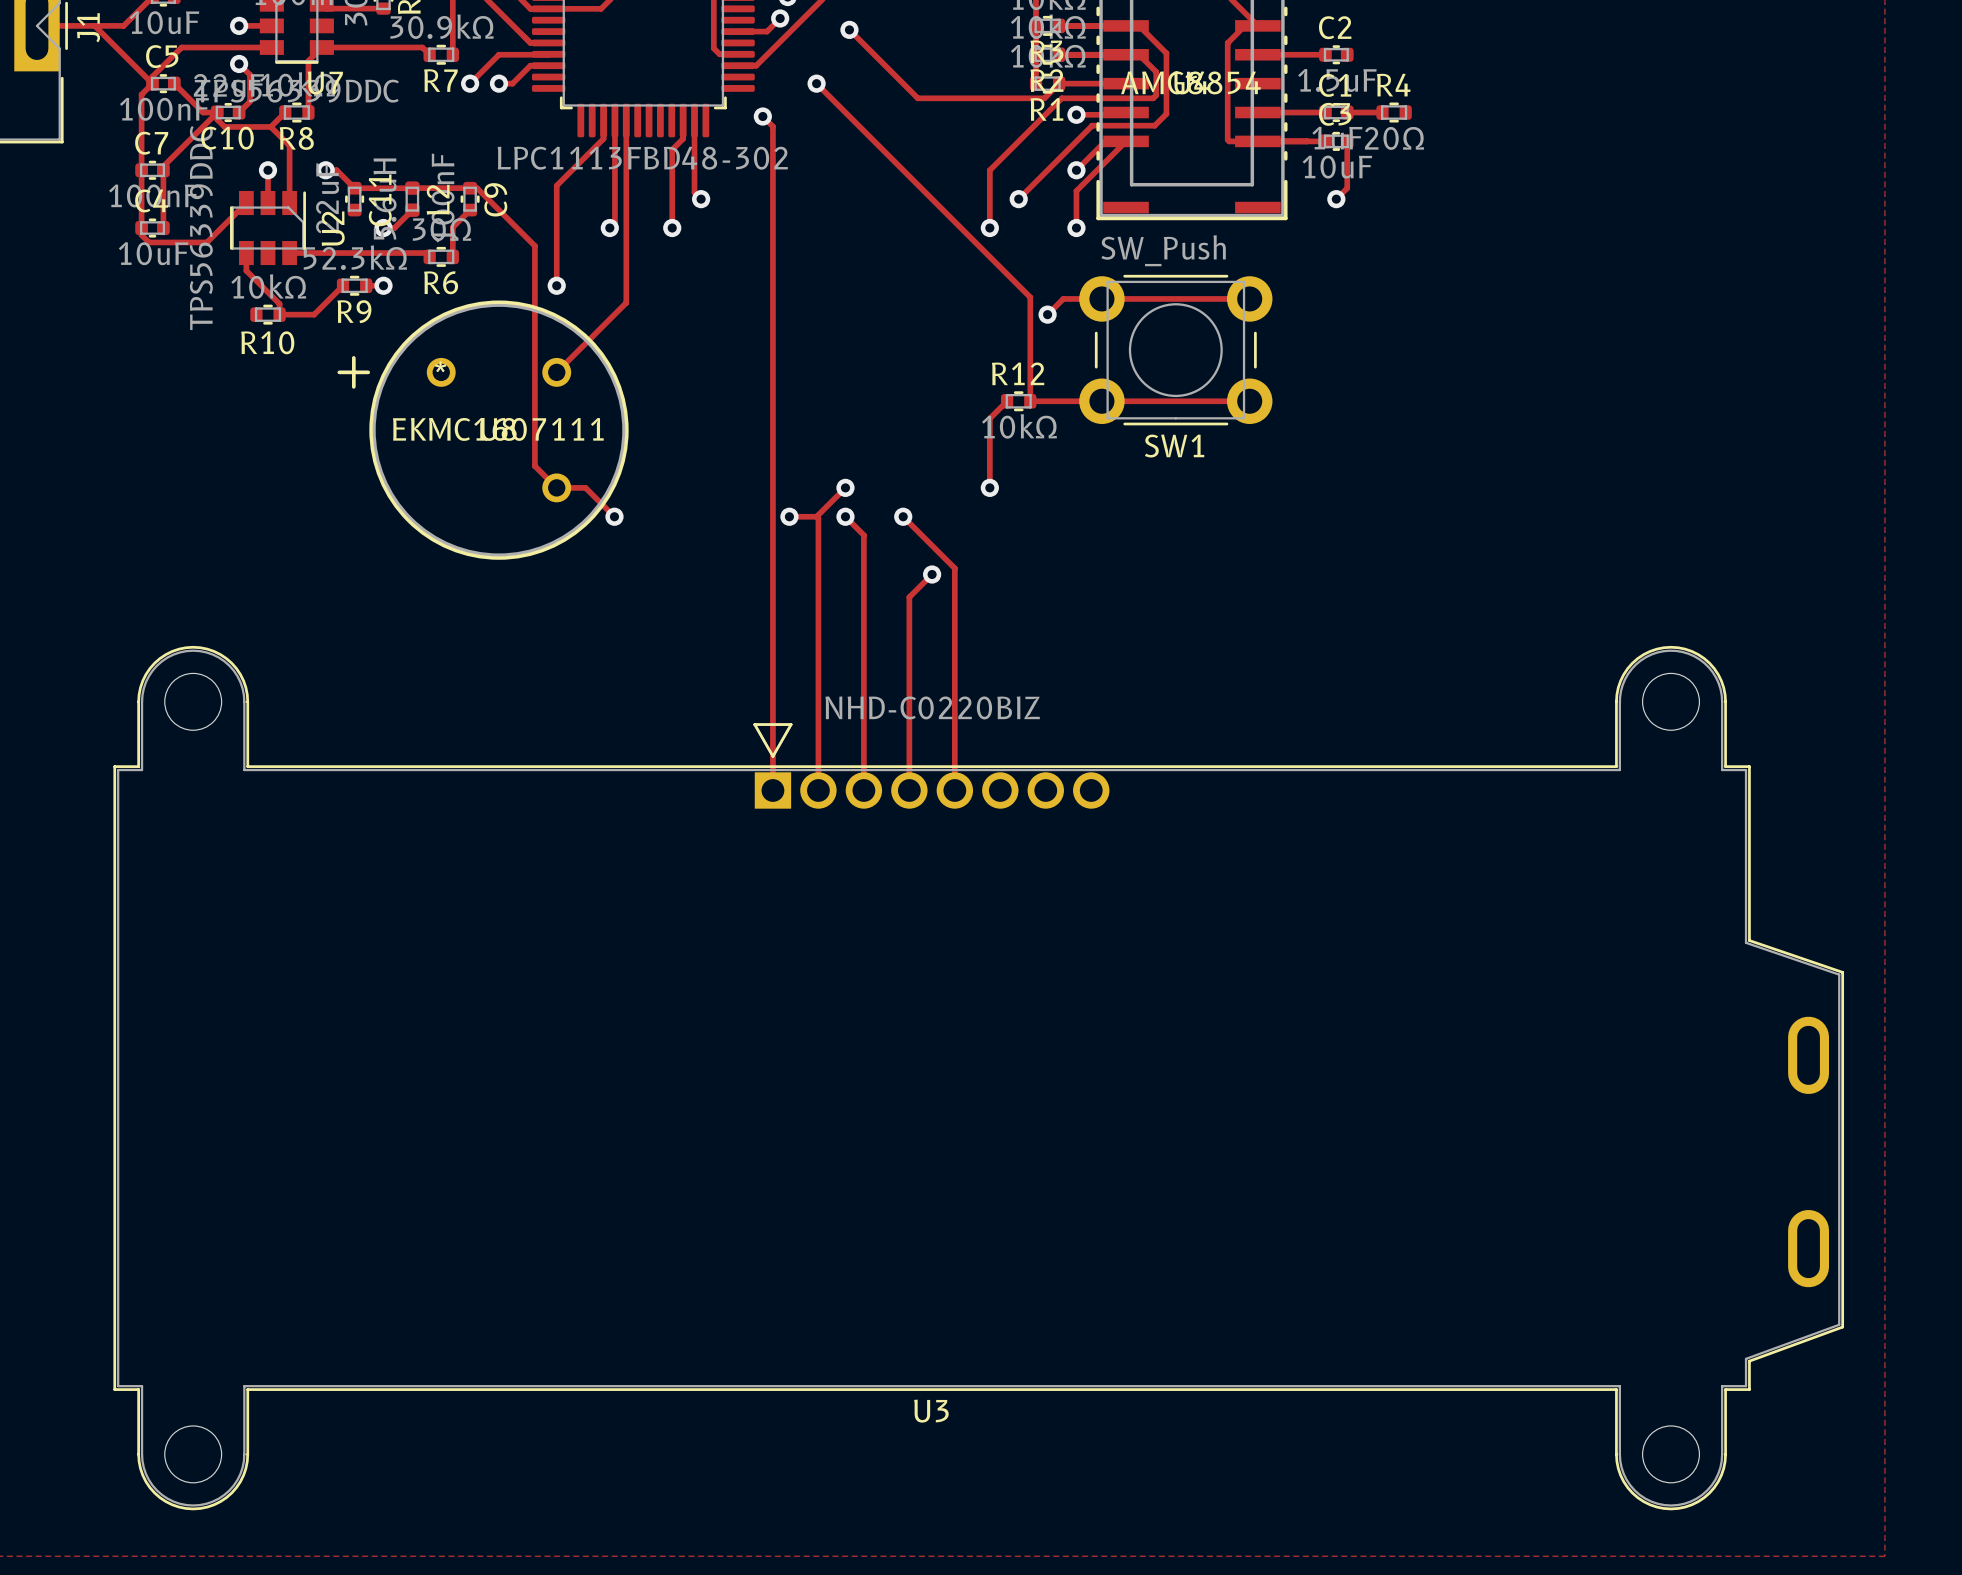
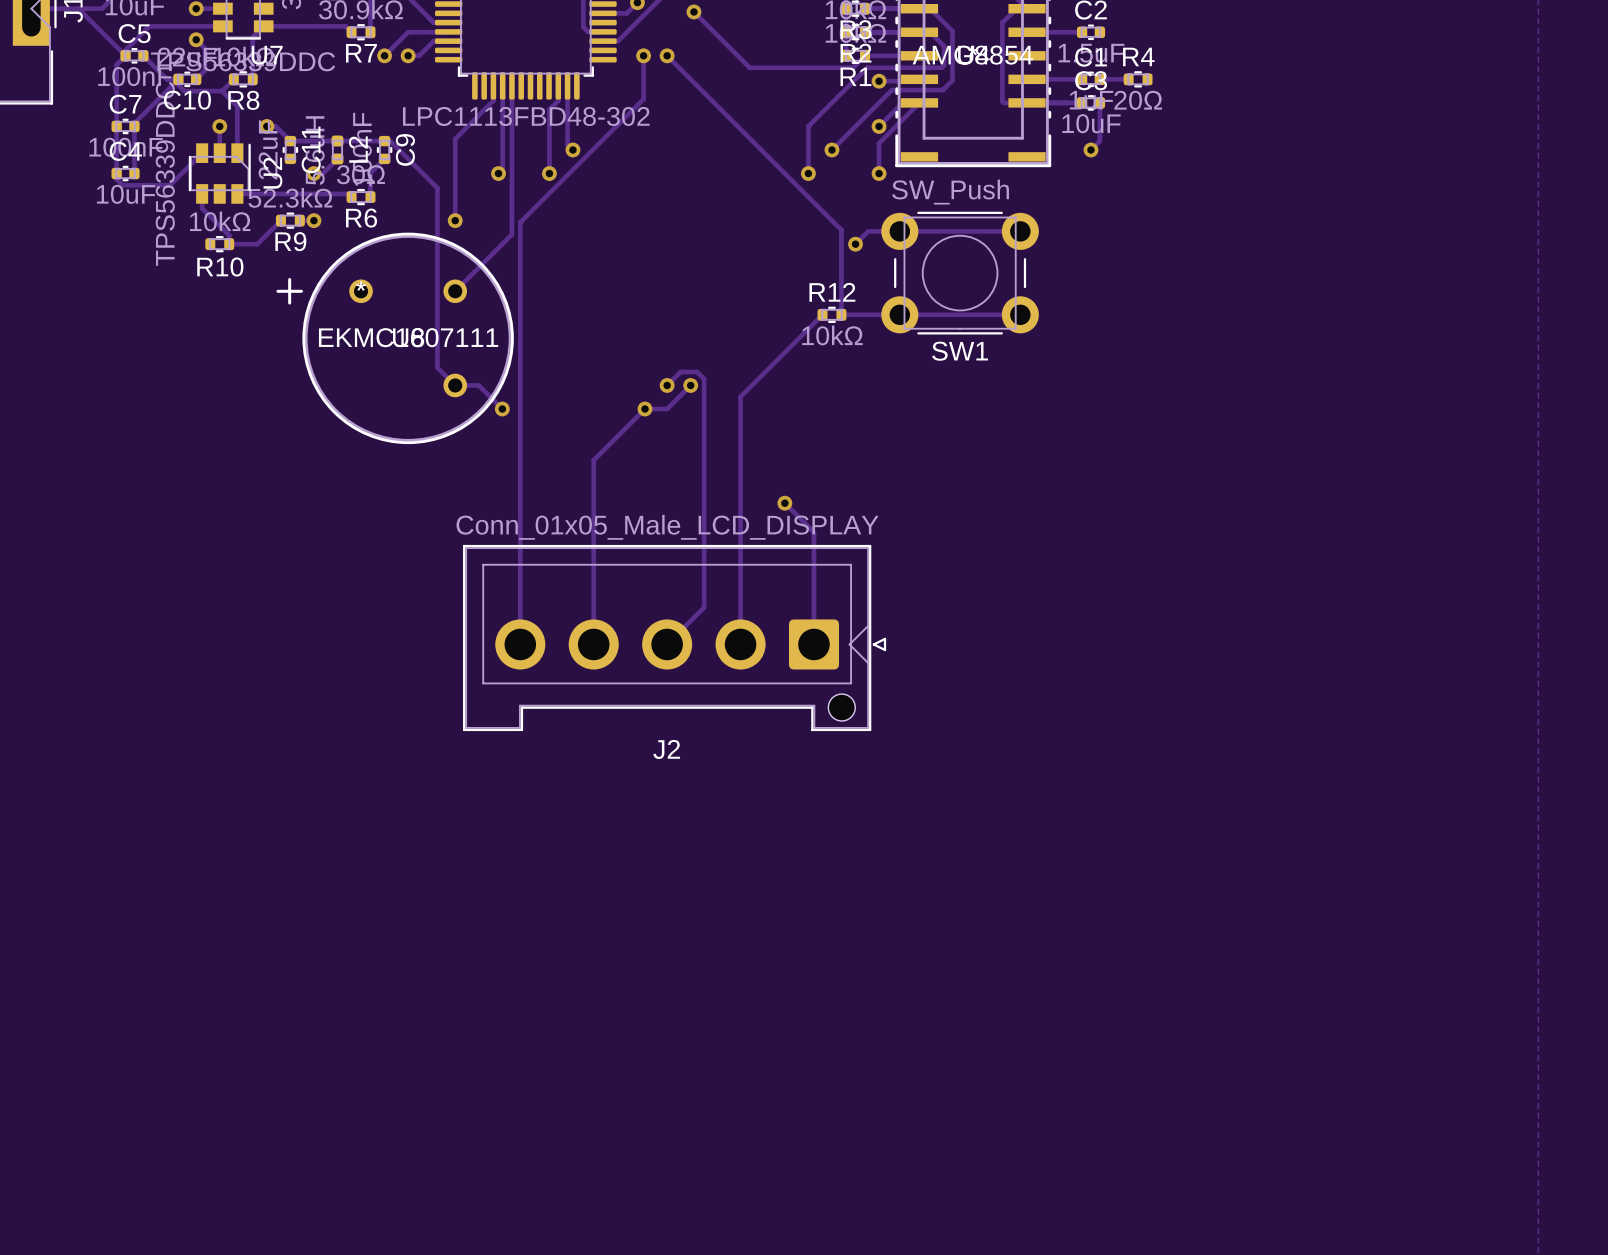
track: none -> (643, 55) (643, 99) (520, 222) (520, 644)
track: (762, 116) (772, 126) (772, 790) -> none
via position: (762, 116) -> (643, 55)
track: (989, 418) (989, 487) -> (808, 328) (740, 396) (740, 644)
track: none -> (667, 385) (680, 372) (697, 372) (704, 379) (704, 607) (667, 644)
via: (989, 487) -> none
track: none -> (644, 409) (593, 460) (593, 644)
track: (816, 516) (818, 518) (818, 790) -> none
track: (845, 516) (863, 535) (863, 790) -> none
via position: (845, 516) -> (667, 385)
track: (903, 516) (954, 568) (954, 790) -> none
via: (903, 516) -> none
track: (932, 574) (909, 597) (909, 790) -> none
via: (932, 574) -> none
track: none -> (784, 503) (813, 532) (813, 644)
via: none -> (784, 503)
J2: none -> Conn_01x05_Male_LCD_DISPLAY (674, 637)
U3: NHD-C0220BIZ (978, 1078) -> none

